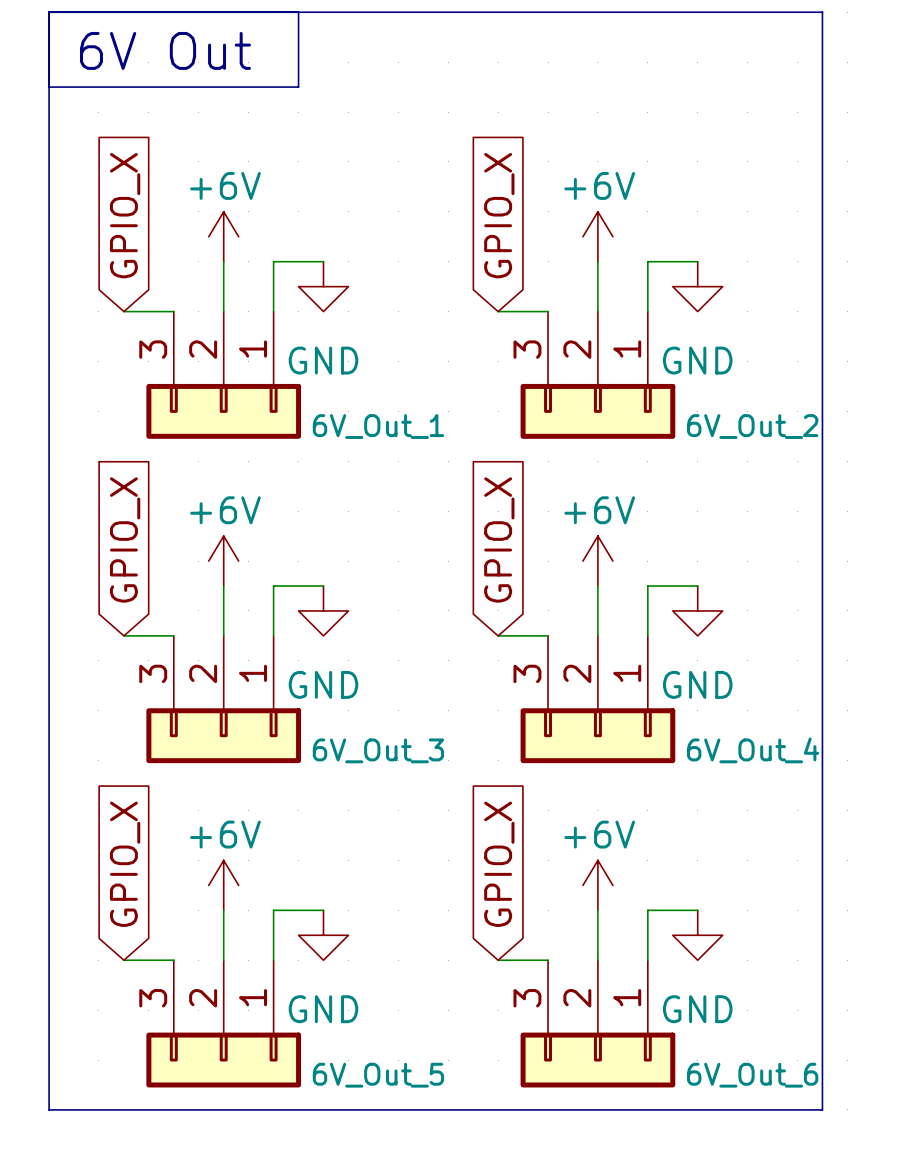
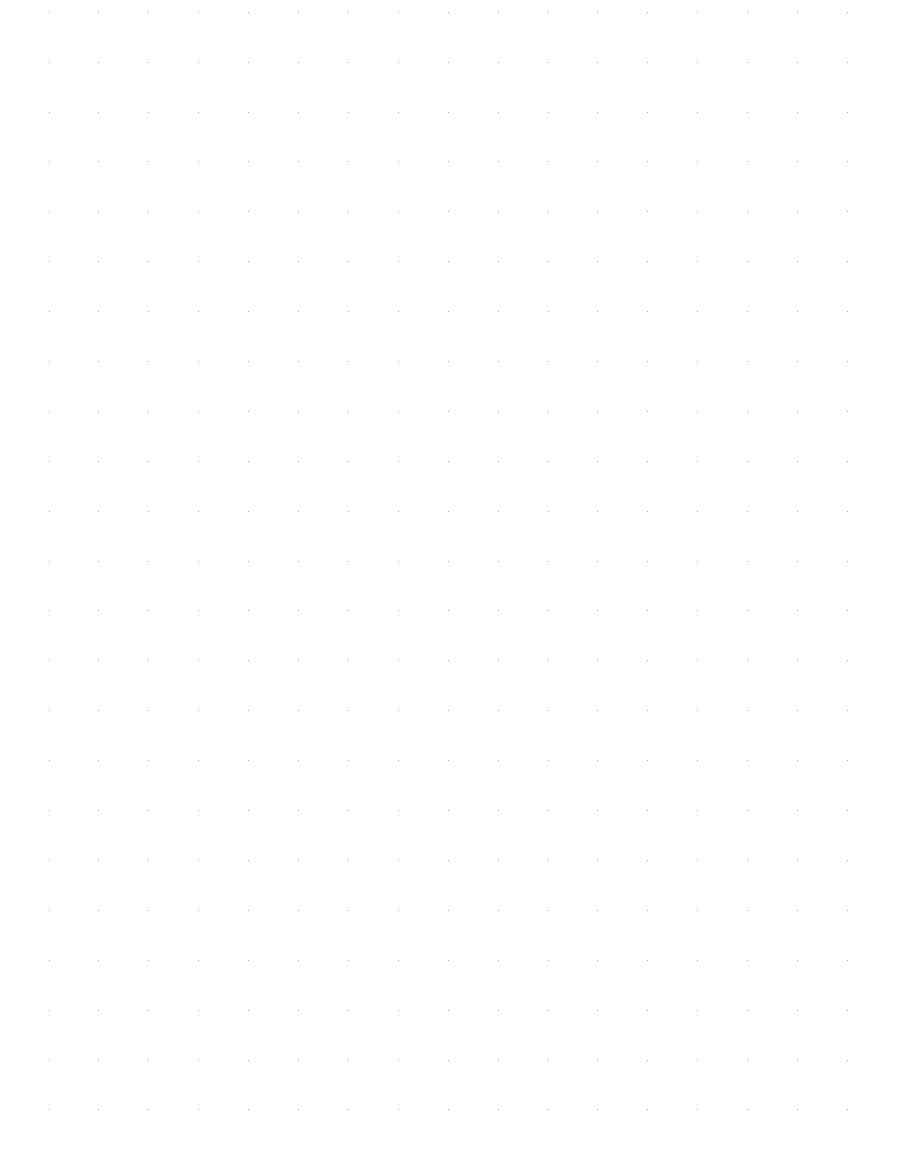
line: (49, 12) (822, 12) (822, 1109) (49, 1109) (49, 12) -> none
line: (298, 12) (298, 87) (49, 87) -> none
text: 6V Out (165, 50) -> none
global label: GPIO_X (125, 215) -> none
global label: GPIO_X (499, 215) -> none
power symbol: +6V (223, 236) -> none
power symbol: +6V (597, 236) -> none
wire: (223, 261) (223, 311) -> none
wire: (323, 261) (273, 261) (273, 311) -> none
wire: (597, 261) (597, 311) -> none
wire: (697, 261) (647, 261) (647, 311) -> none
power symbol: GND (323, 286) -> none
power symbol: GND (697, 286) -> none
wire: (123, 311) (173, 311) -> none
wire: (498, 311) (548, 311) -> none
part: 6V_Out_1 (223, 375) -> none
part: 6V_Out_2 (597, 375) -> none
global label: GPIO_X (125, 539) -> none
global label: GPIO_X (499, 539) -> none
power symbol: +6V (223, 561) -> none
power symbol: +6V (597, 561) -> none
wire: (223, 586) (223, 635) -> none
wire: (323, 586) (273, 586) (273, 635) -> none
wire: (597, 586) (597, 635) -> none
wire: (697, 586) (647, 586) (647, 635) -> none
power symbol: GND (323, 610) -> none
power symbol: GND (697, 610) -> none
wire: (123, 635) (173, 635) -> none
wire: (498, 635) (548, 635) -> none
part: 6V_Out_3 (223, 699) -> none
part: 6V_Out_4 (597, 699) -> none
global label: GPIO_X (125, 864) -> none
global label: GPIO_X (499, 864) -> none
power symbol: +6V (223, 885) -> none
power symbol: +6V (597, 885) -> none
wire: (223, 910) (223, 960) -> none
wire: (323, 910) (273, 910) (273, 960) -> none
wire: (597, 910) (597, 960) -> none
wire: (697, 910) (647, 910) (647, 960) -> none
power symbol: GND (323, 935) -> none
power symbol: GND (697, 935) -> none
wire: (123, 960) (173, 960) -> none
wire: (498, 960) (548, 960) -> none
part: 6V_Out_5 (223, 1023) -> none
part: 6V_Out_6 (597, 1023) -> none

